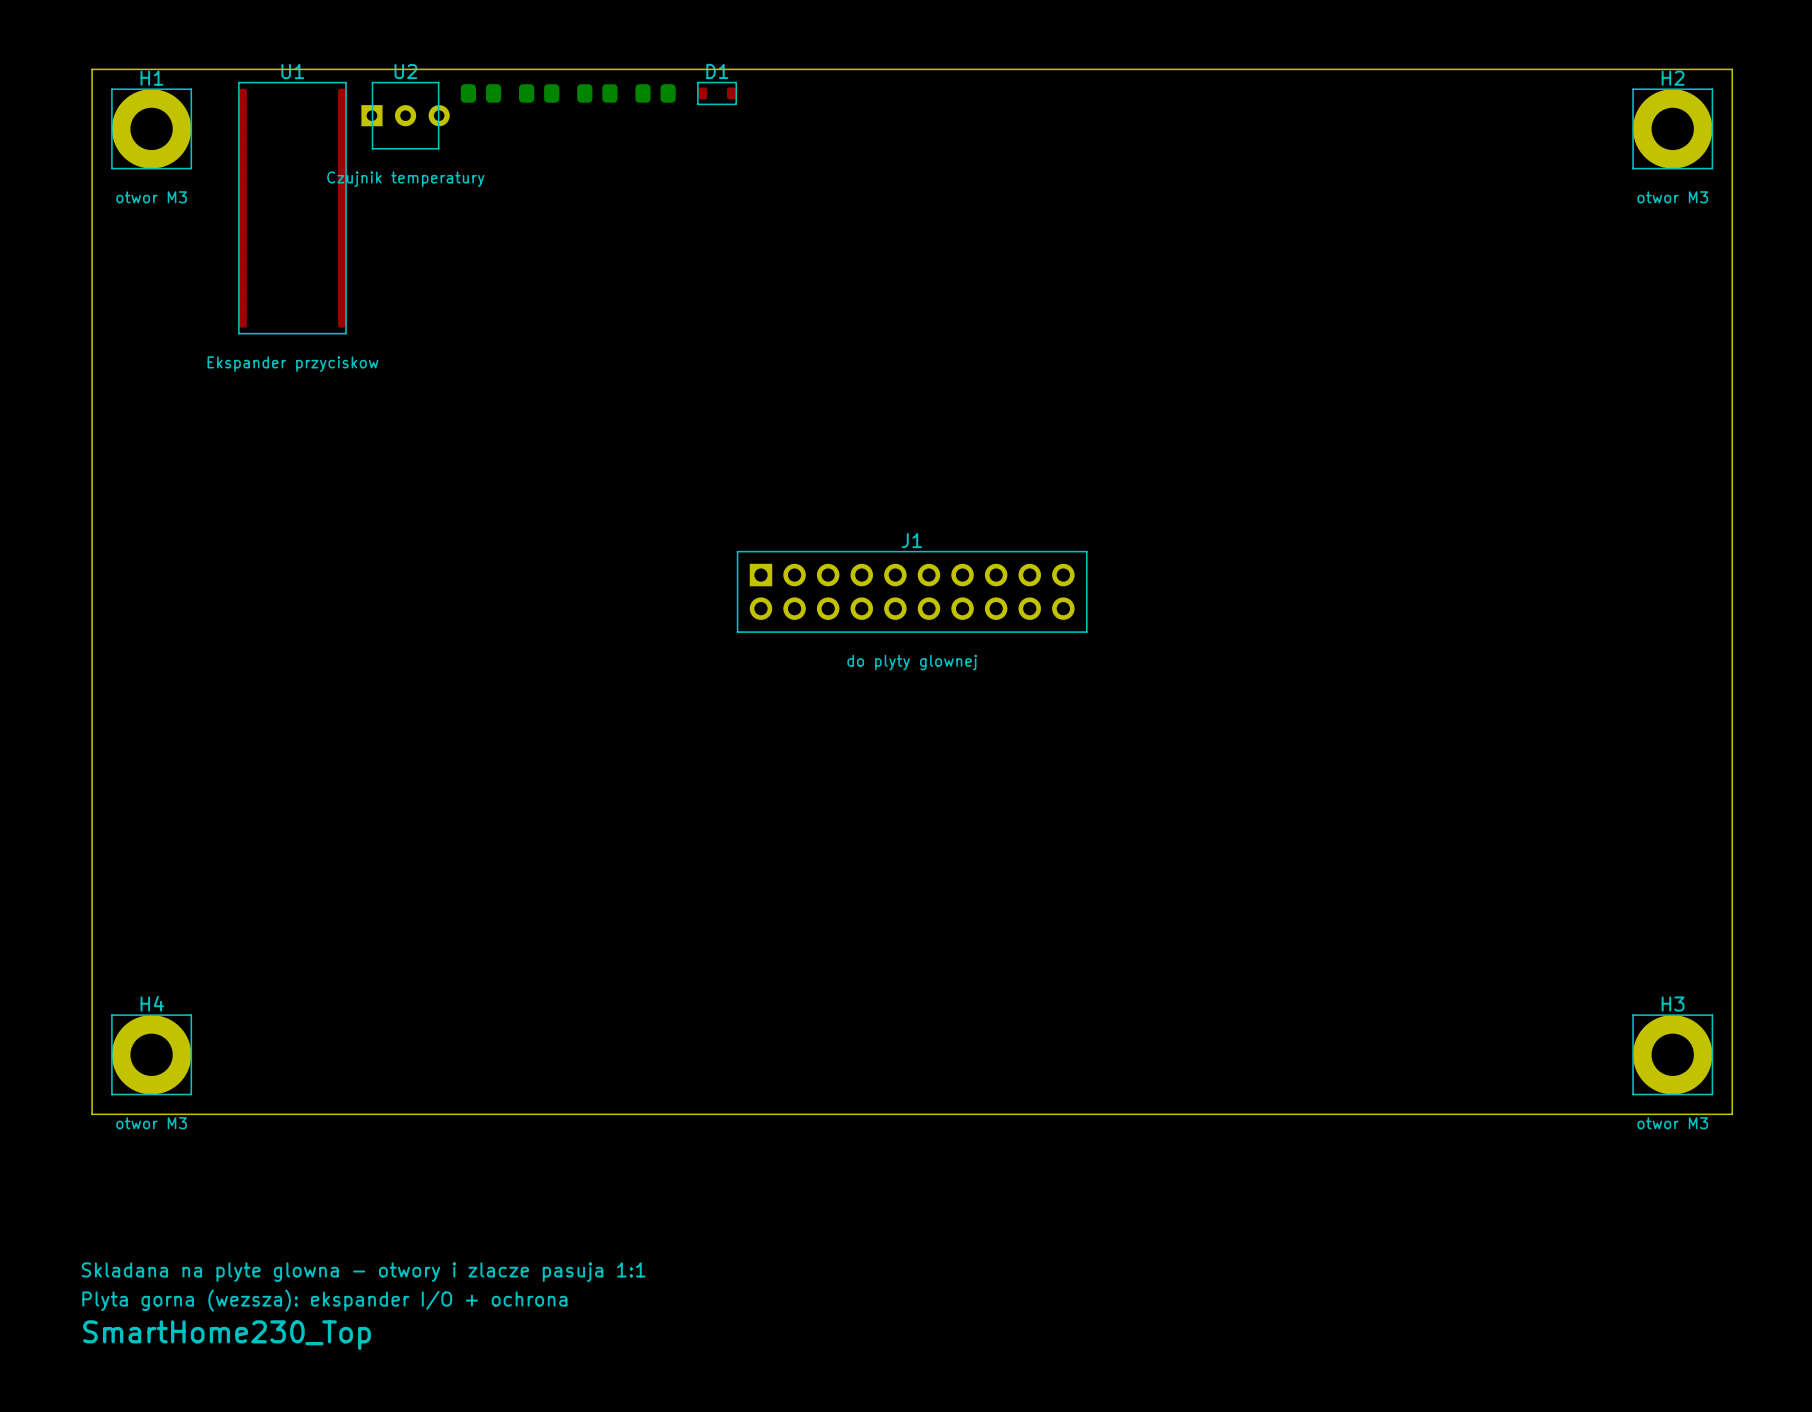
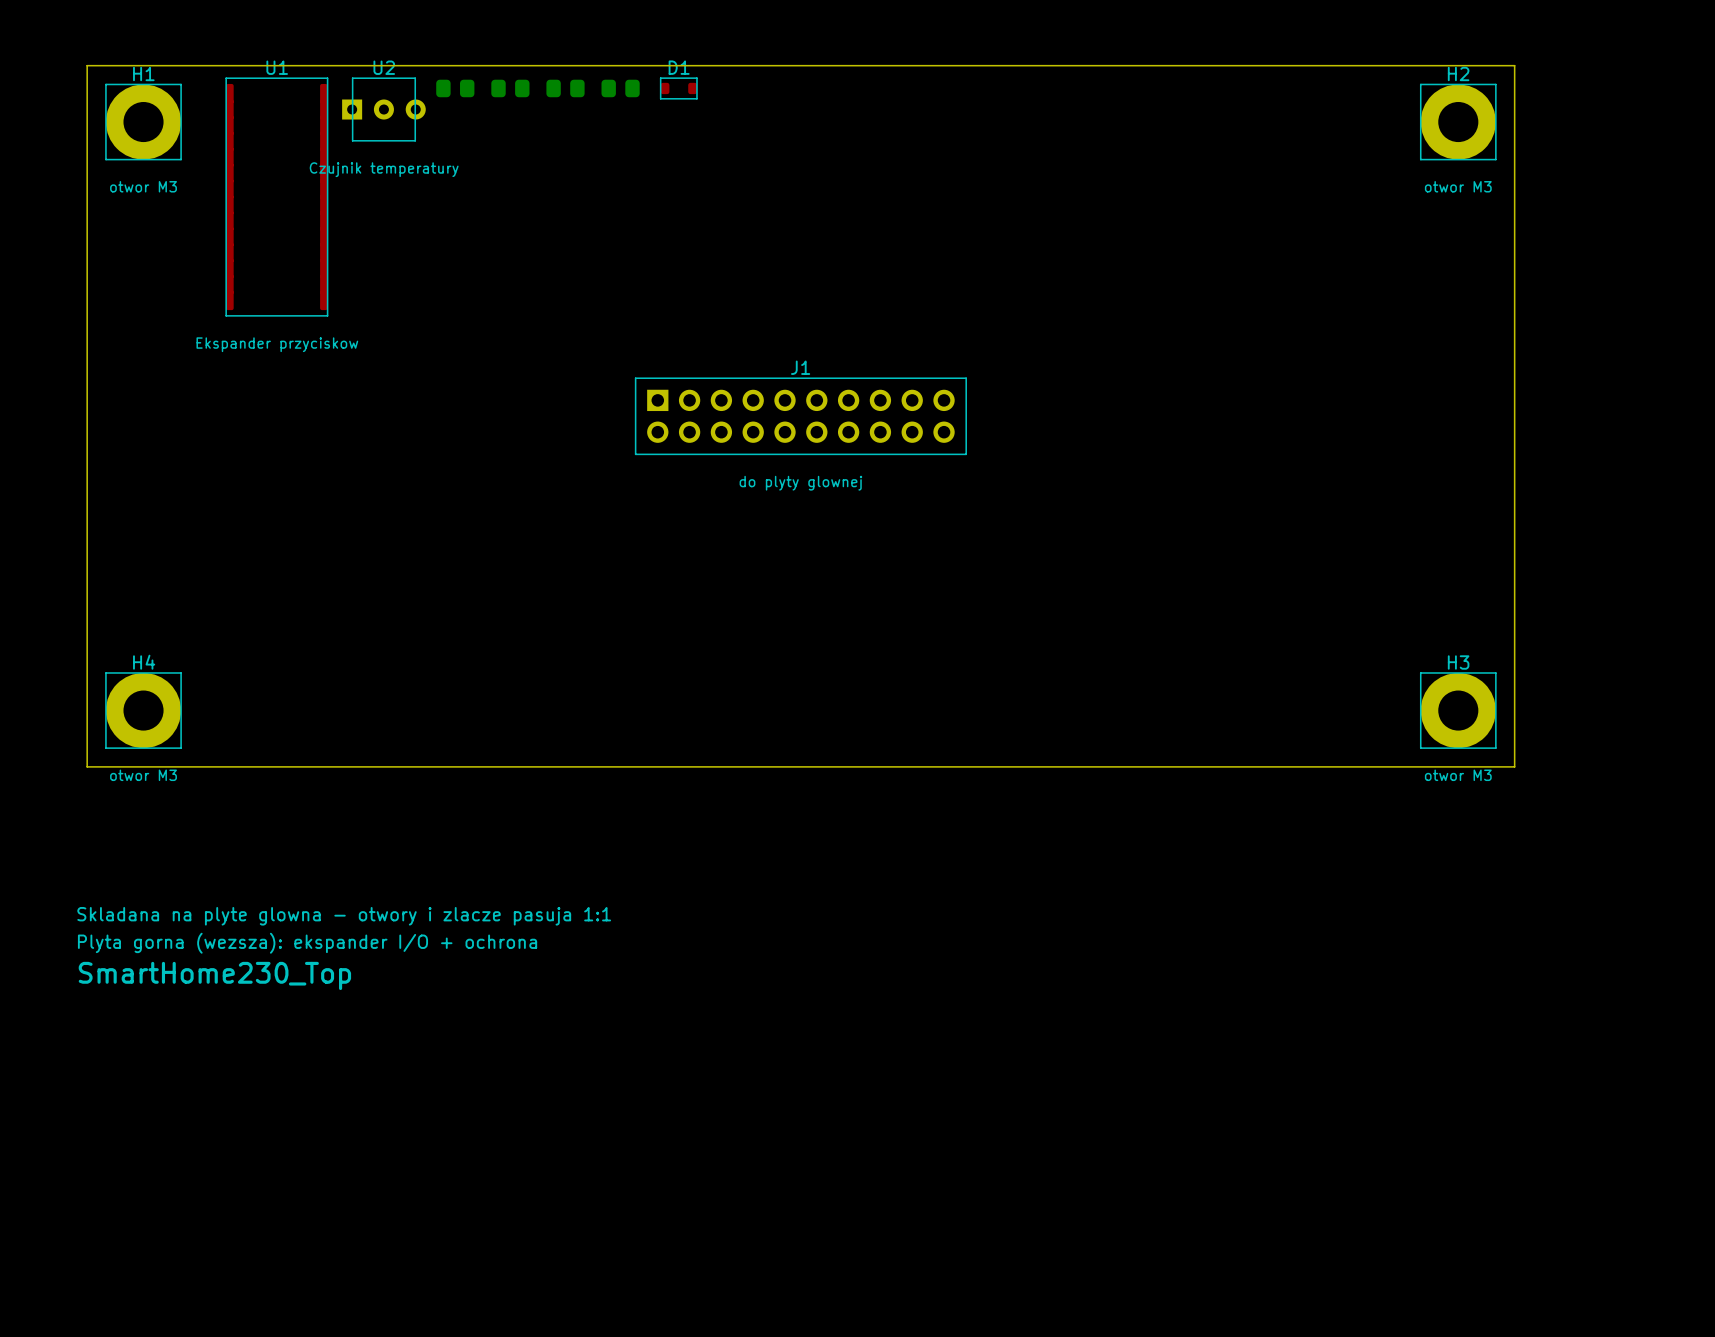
board edge: (1599, 69) (1732, 69) (1732, 1114) (92, 1114) (92, 810) -> (1514, 65) (1514, 766) (87, 766)
H2 position: (1672, 128) -> (1458, 122)
J1 position: (912, 591) -> (800, 416)
H4 position: (151, 1054) -> (143, 710)
H3 position: (1672, 1054) -> (1458, 710)
text position: Skladana na plyte glowna - otwory i zlacze pasuja 1:1 (363, 1272) -> Skladana na plyte glowna - otwory i zlacze pasuja 1:1 (344, 916)
text position: Plyta gorna (wezsza): ekspander I/O + ochrona (324, 1300) -> Plyta gorna (wezsza): ekspander I/O + ochrona (307, 943)
text position: SmartHome230_Top (227, 1335) -> SmartHome230_Top (214, 975)

